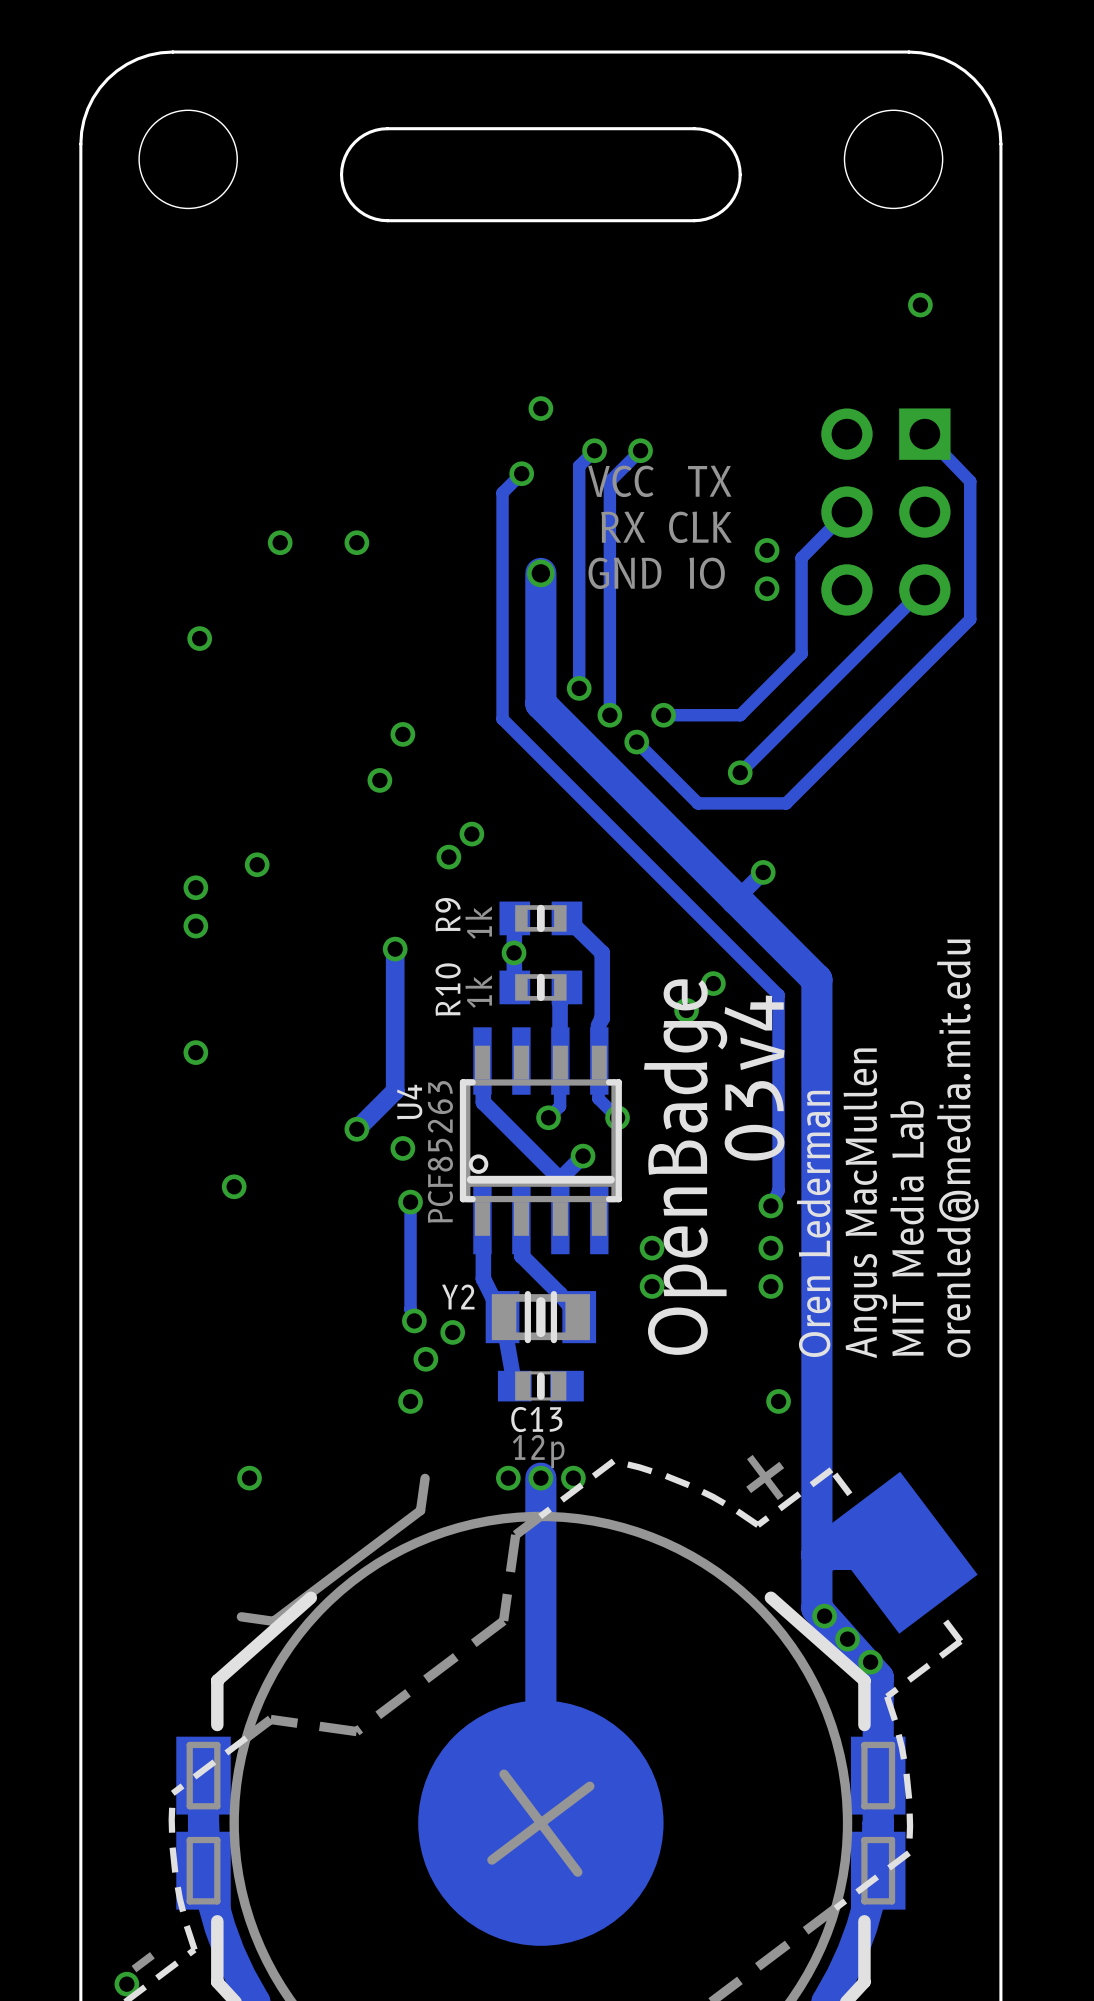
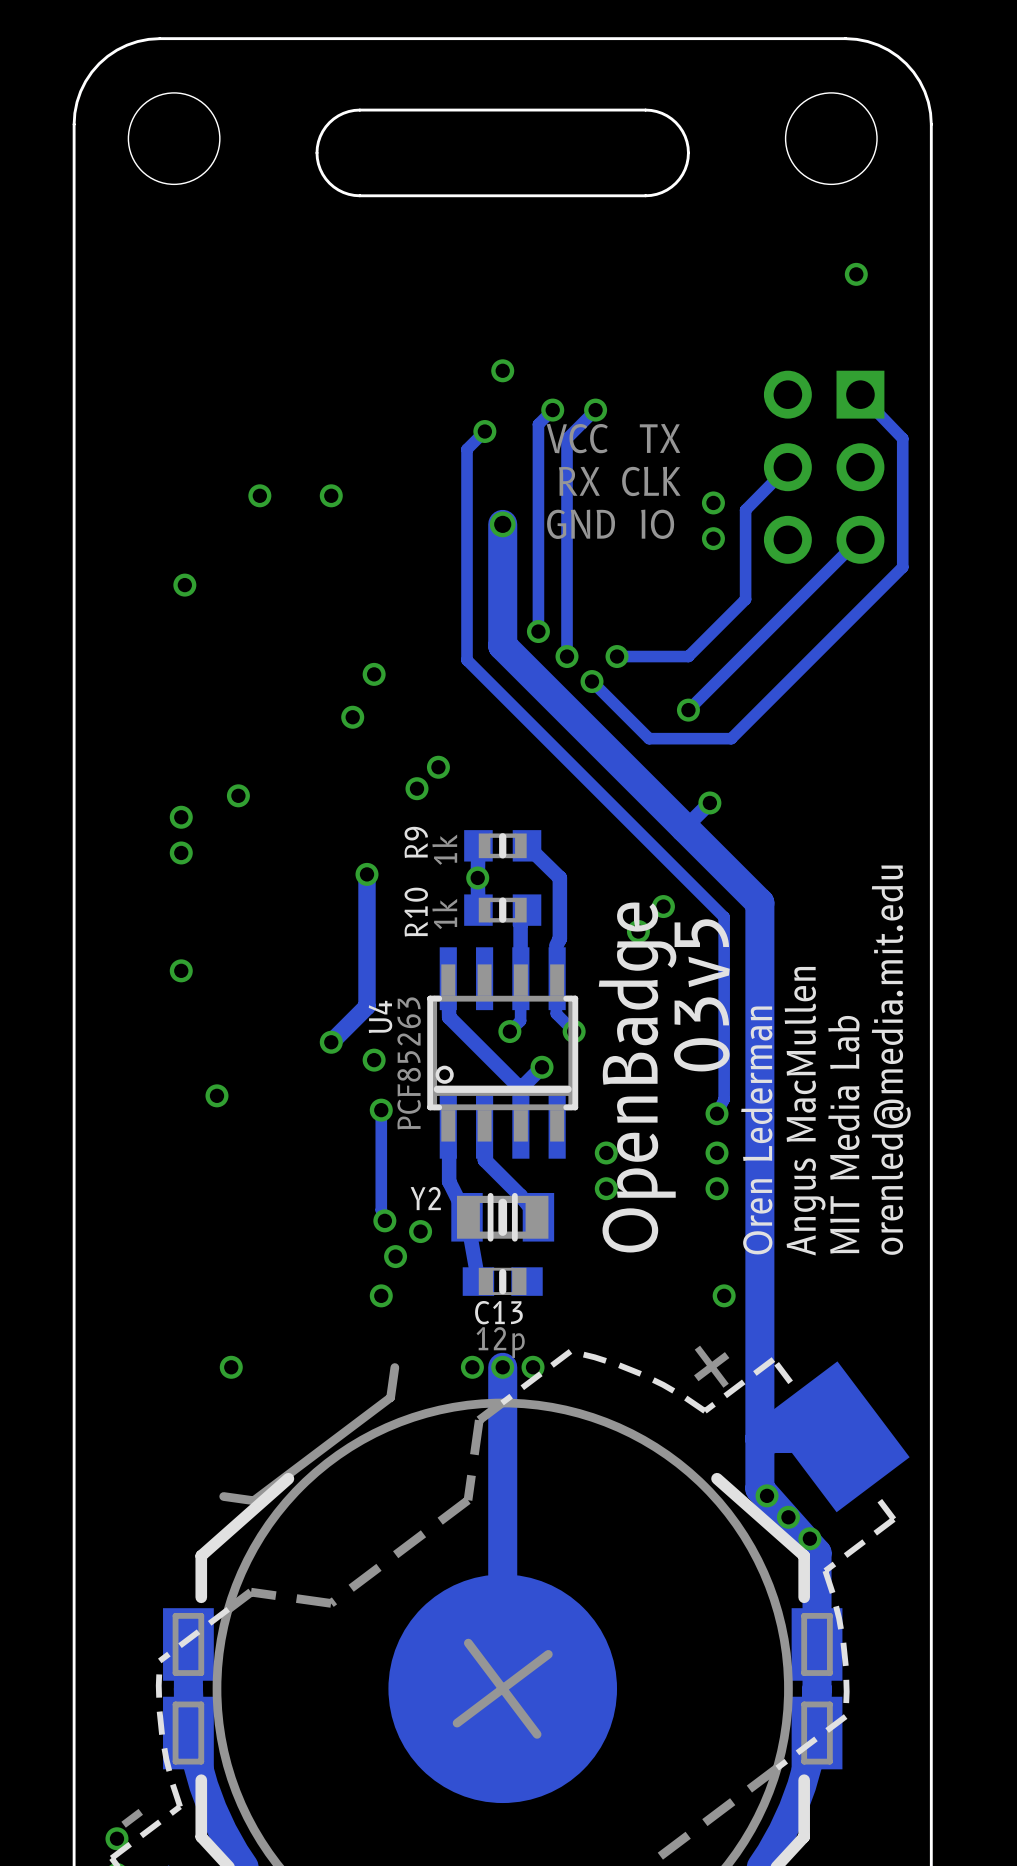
text: 03v4 (754, 1078) -> 03v5 (701, 995)

